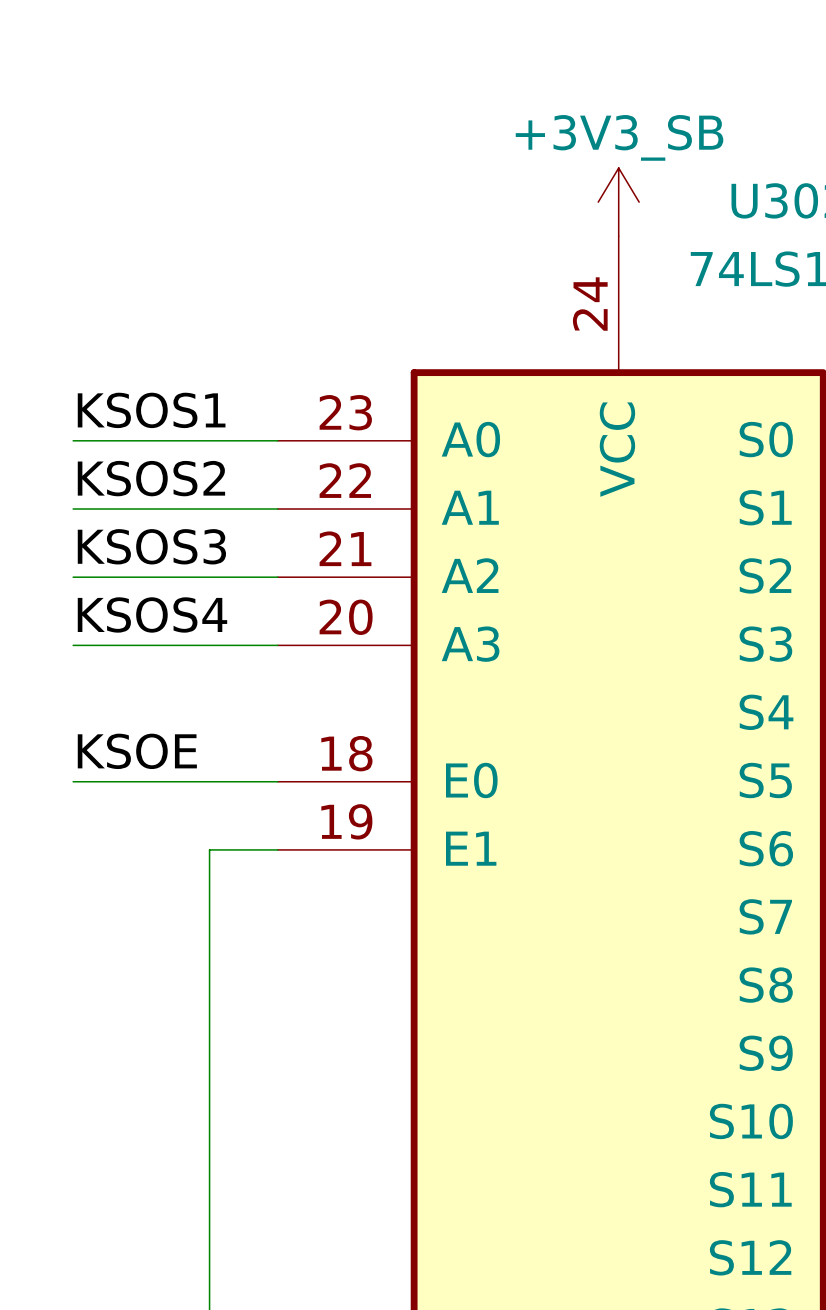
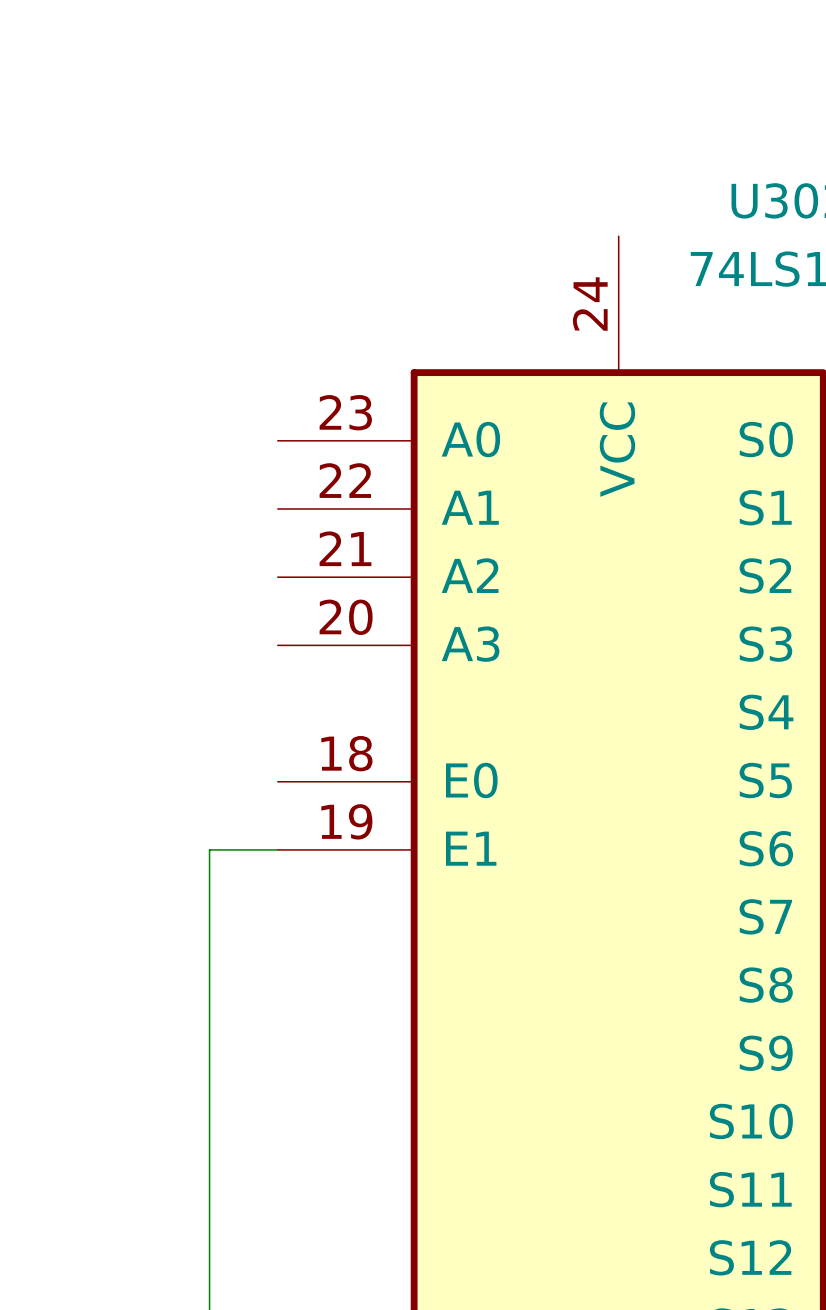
power symbol: +3V3_SB (618, 202) -> none
label: KSOS1 (151, 410) -> none
wire: (73, 440) (277, 440) -> none
label: KSOS2 (151, 478) -> none
wire: (73, 509) (277, 509) -> none
label: KSOS3 (151, 546) -> none
wire: (73, 577) (277, 577) -> none
label: KSOS4 (152, 614) -> none
wire: (73, 645) (277, 645) -> none
label: KSOE (137, 751) -> none
wire: (73, 781) (277, 781) -> none

